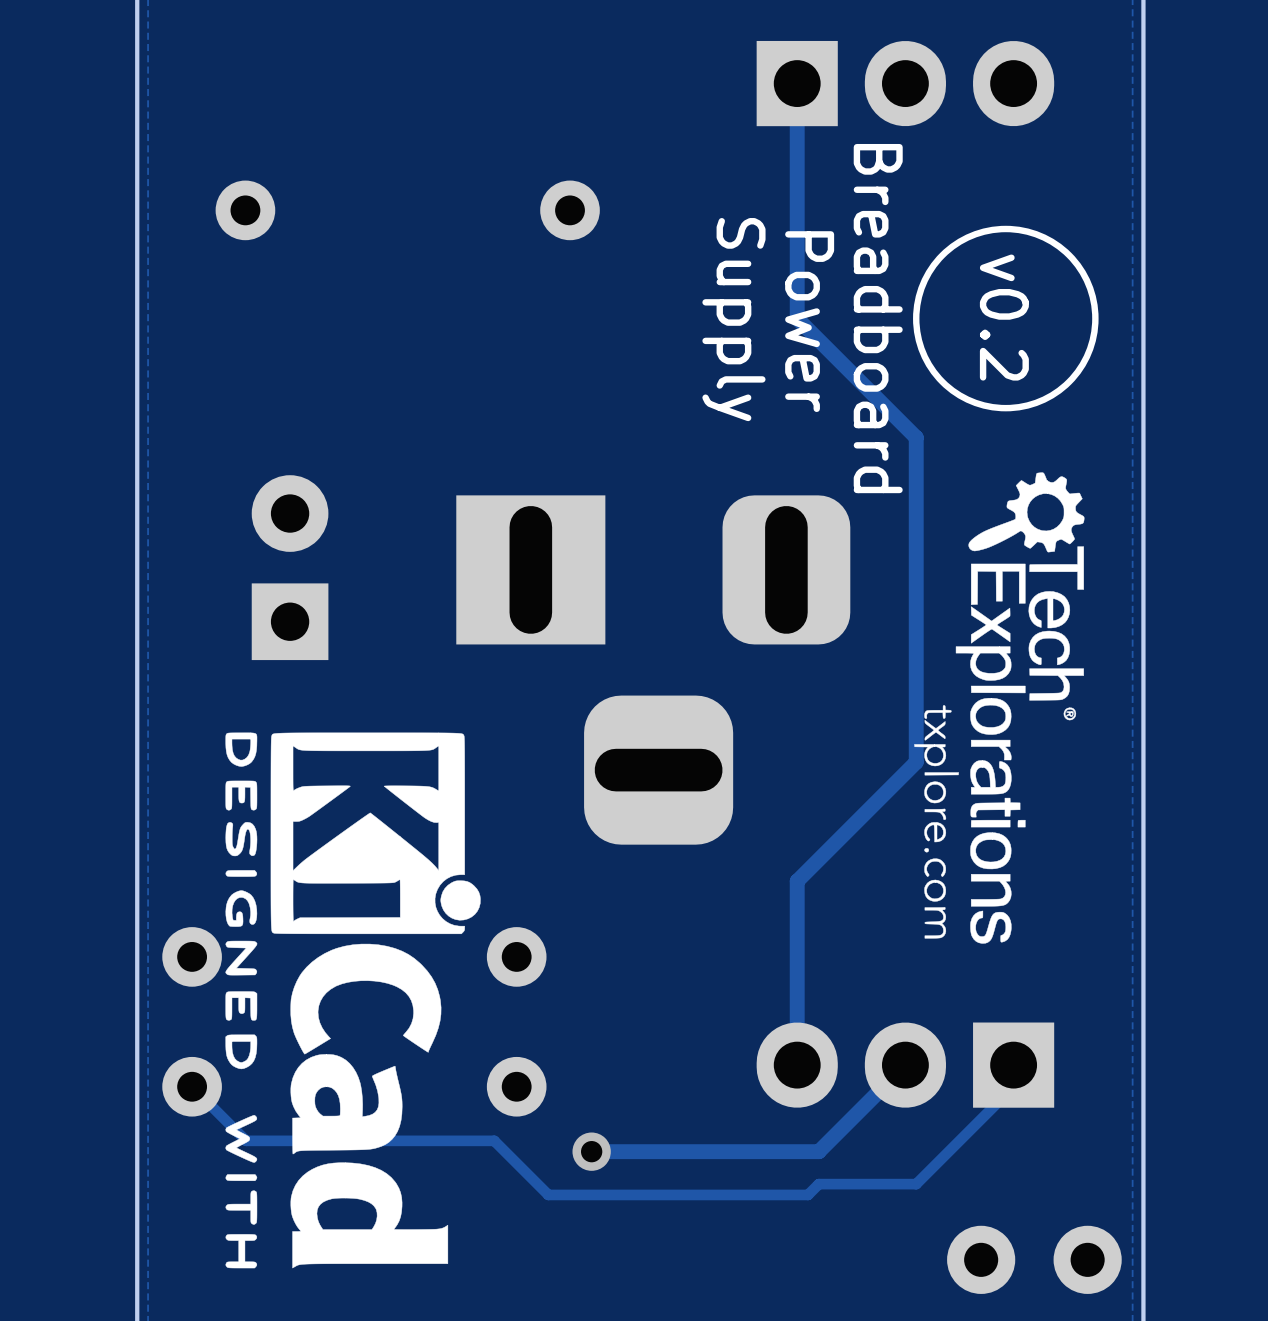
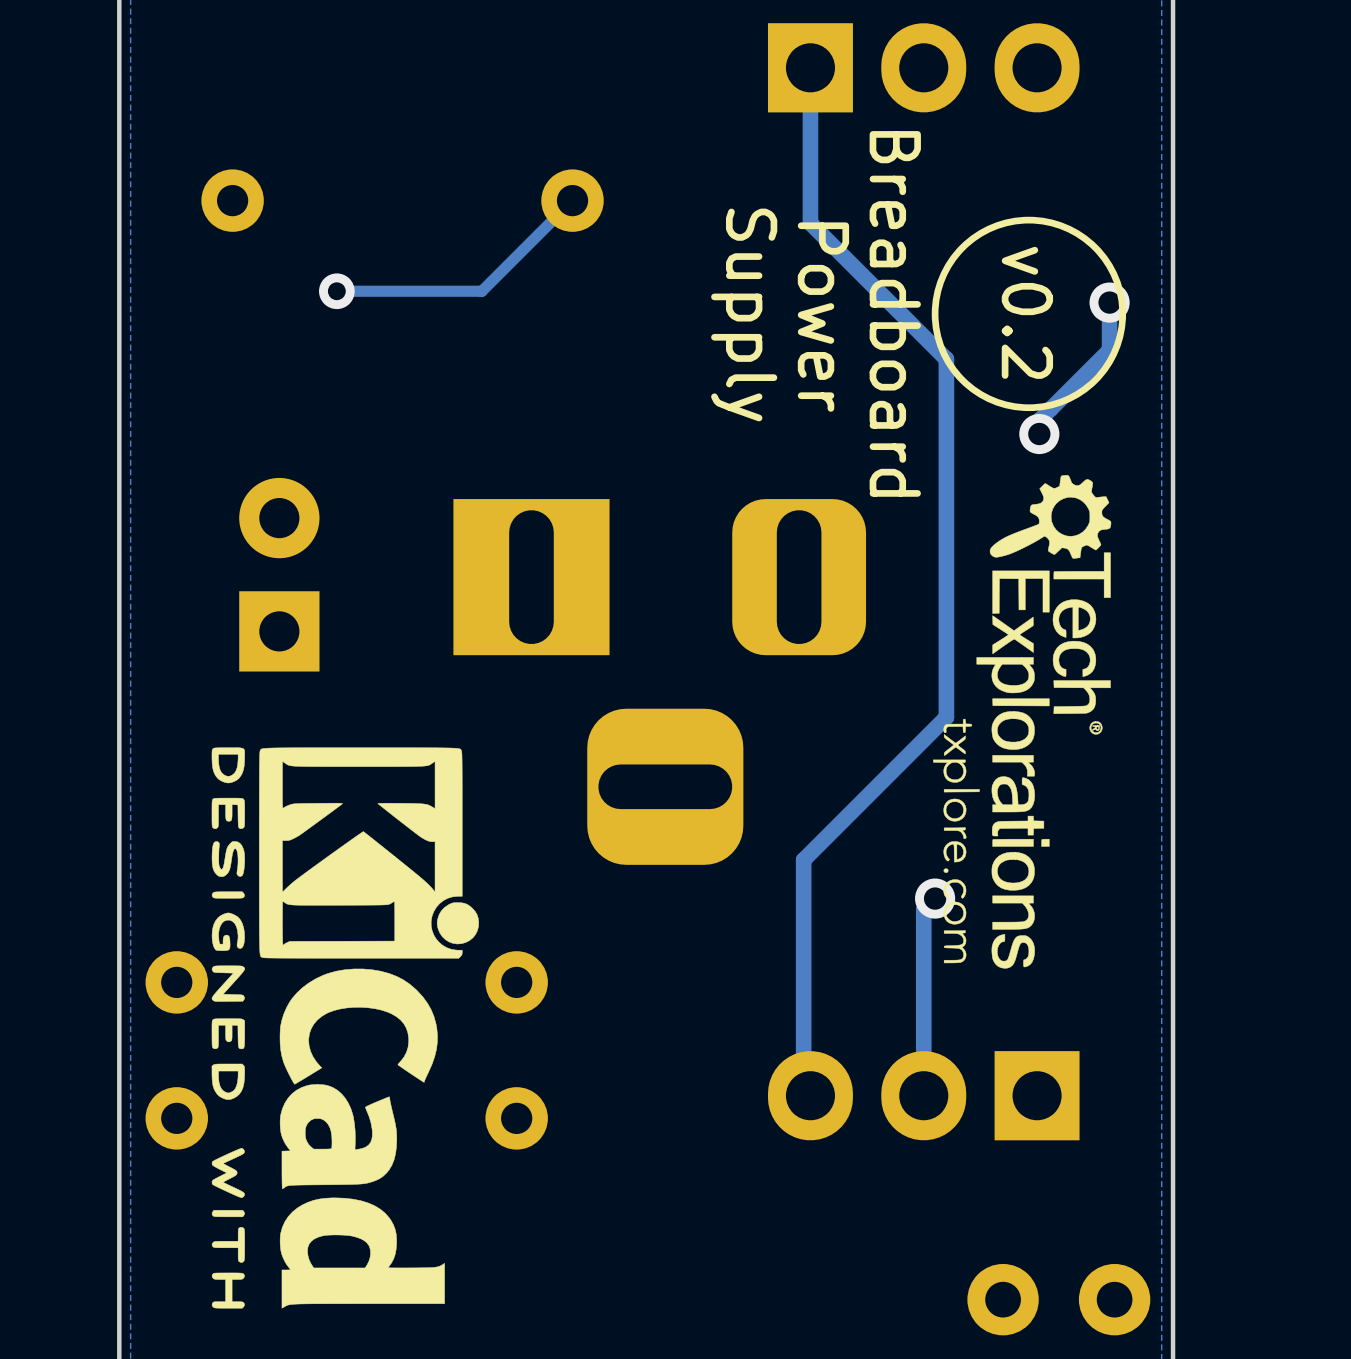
track: none -> (572, 200) (481, 291) (336, 291)
track: (797, 232) (797, 318) (916, 437) (916, 762) (797, 881) (797, 1060) -> (810, 223) (946, 359) (946, 717) (803, 860) (803, 1084) (810, 1091)
via: none -> (336, 291)
track: none -> (1109, 302) (1109, 350) (1039, 420) (1039, 434)
via: none -> (1109, 302)
via: none -> (1039, 434)
via: none -> (935, 898)
track: (905, 1065) (818, 1151) (591, 1151) -> (923, 1095) (923, 909) (935, 898)
track: (1013, 1065) (1013, 1086) (916, 1184) (818, 1184) (808, 1194) (548, 1194) (494, 1140) (246, 1140) (192, 1086) -> none
via: (591, 1151) -> none

